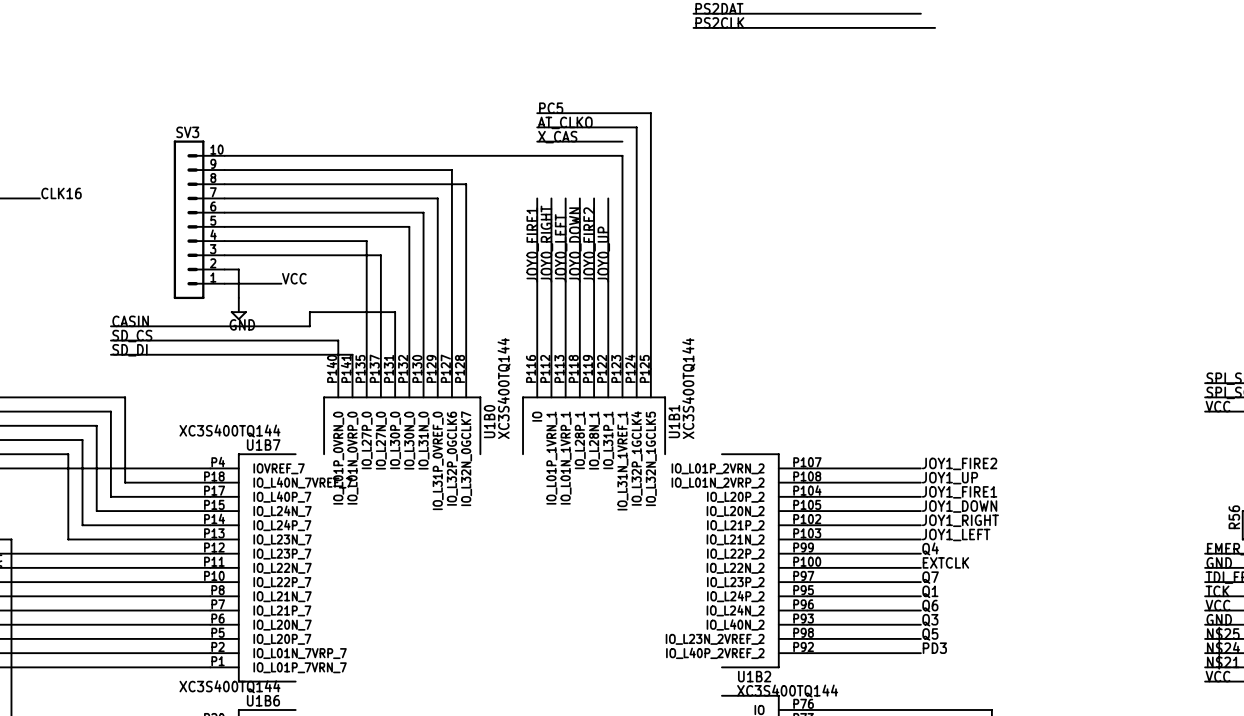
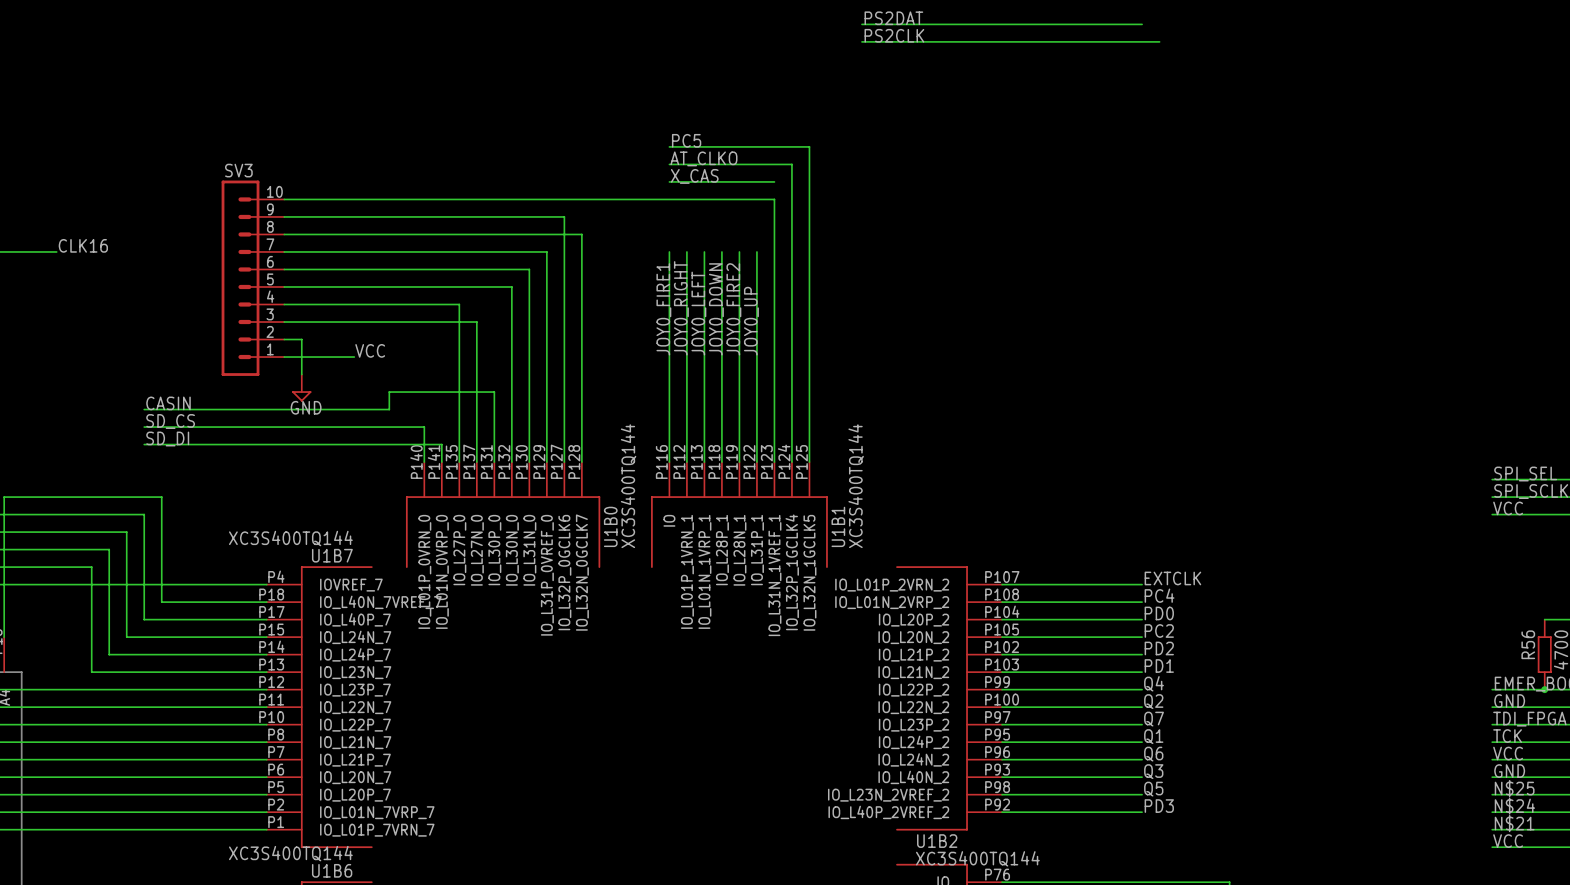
label: JOY1_FIRE2 (959, 463) -> EXTCLK (1172, 578)
label: JOY1_UP (949, 478) -> PC4 (1159, 595)
label: JOY1_FIRE1 (959, 492) -> PD0 (1159, 613)
label: JOY1_DOWN (959, 506) -> PC2 (1159, 630)
label: JOY1_RIGHT (960, 520) -> PD2 (1159, 648)
label: JOY1_LEFT (956, 534) -> PD1 (1159, 666)
label: EXTCLK (945, 562) -> Q2 (1153, 701)

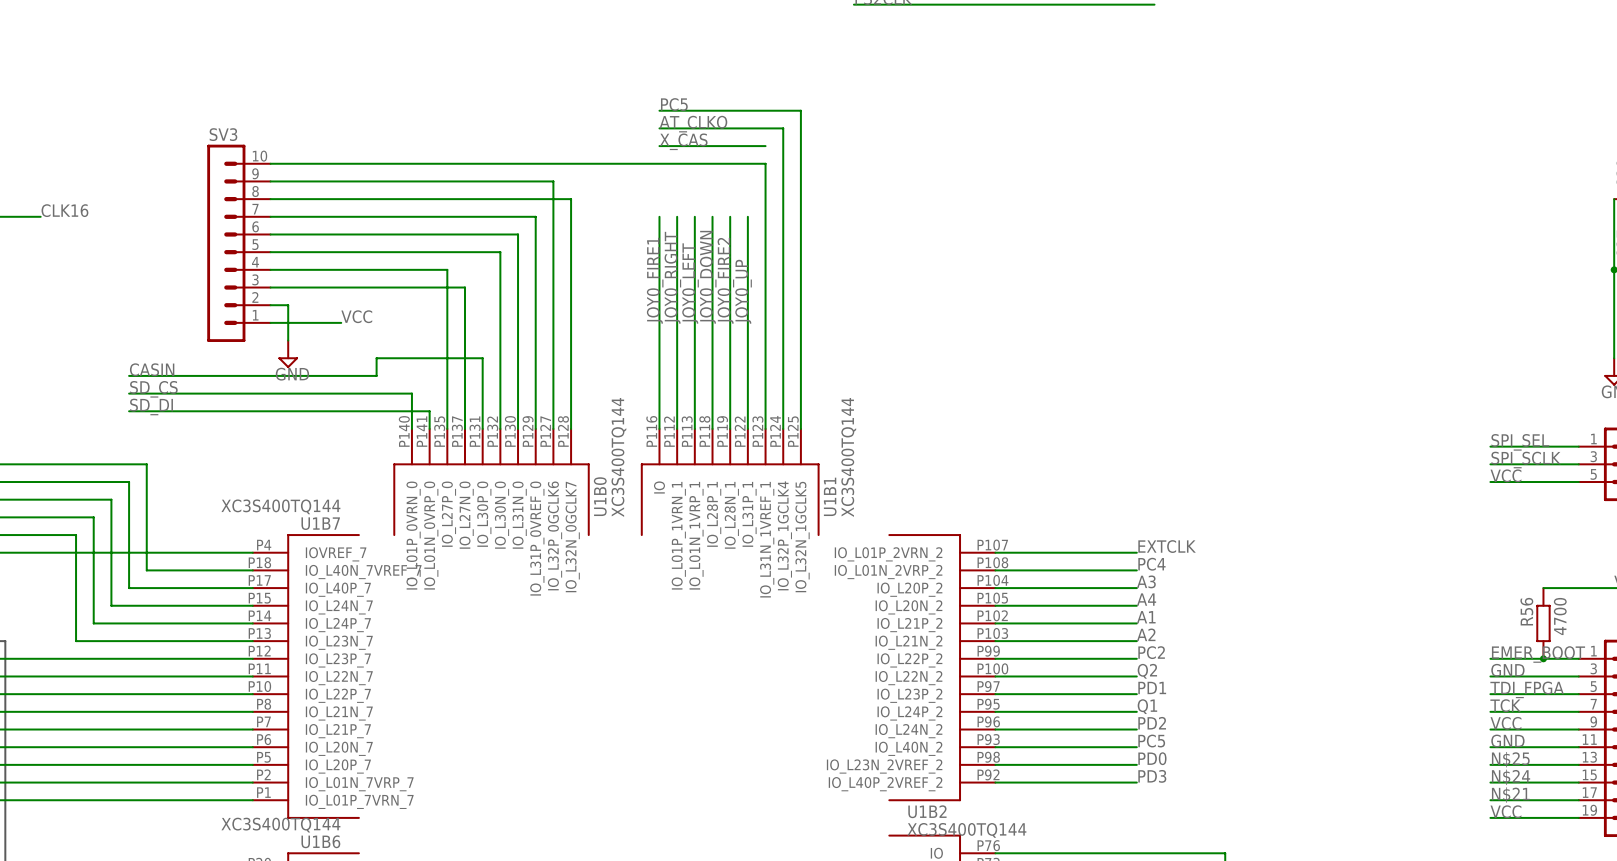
label: PD0 (1159, 613) -> A3 (1146, 581)
label: PC2 (1159, 630) -> A4 (1146, 599)
label: PD2 (1159, 648) -> A1 (1146, 617)
label: PD1 (1159, 666) -> A2 (1146, 634)
label: Q4 (1154, 683) -> PC2 (1151, 652)
label: Q7 (1154, 719) -> PD1 (1152, 687)
label: Q6 (1153, 754) -> PD2 (1152, 723)
label: Q3 (1153, 771) -> PC5 (1151, 741)
label: Q5 (1153, 789) -> PD0 (1152, 758)

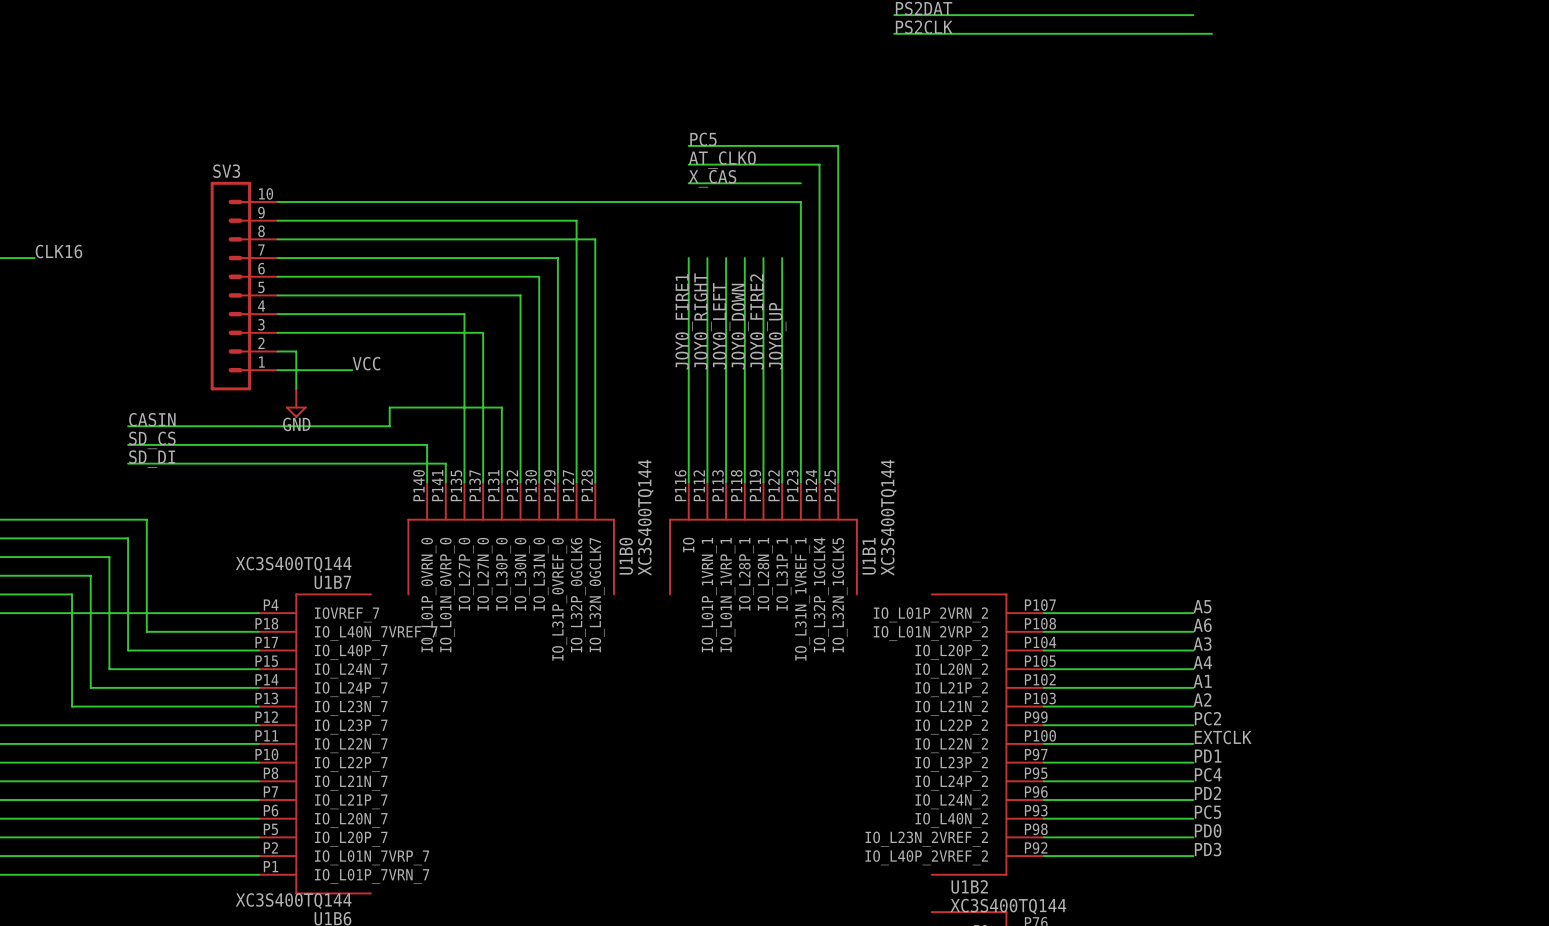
label: EXTCLK (1167, 546) -> A5 (1202, 606)
label: PC4 (1151, 564) -> A6 (1202, 625)
label: Q2 (1147, 671) -> EXTCLK (1223, 737)
label: Q1 (1147, 706) -> PC4 (1208, 774)

